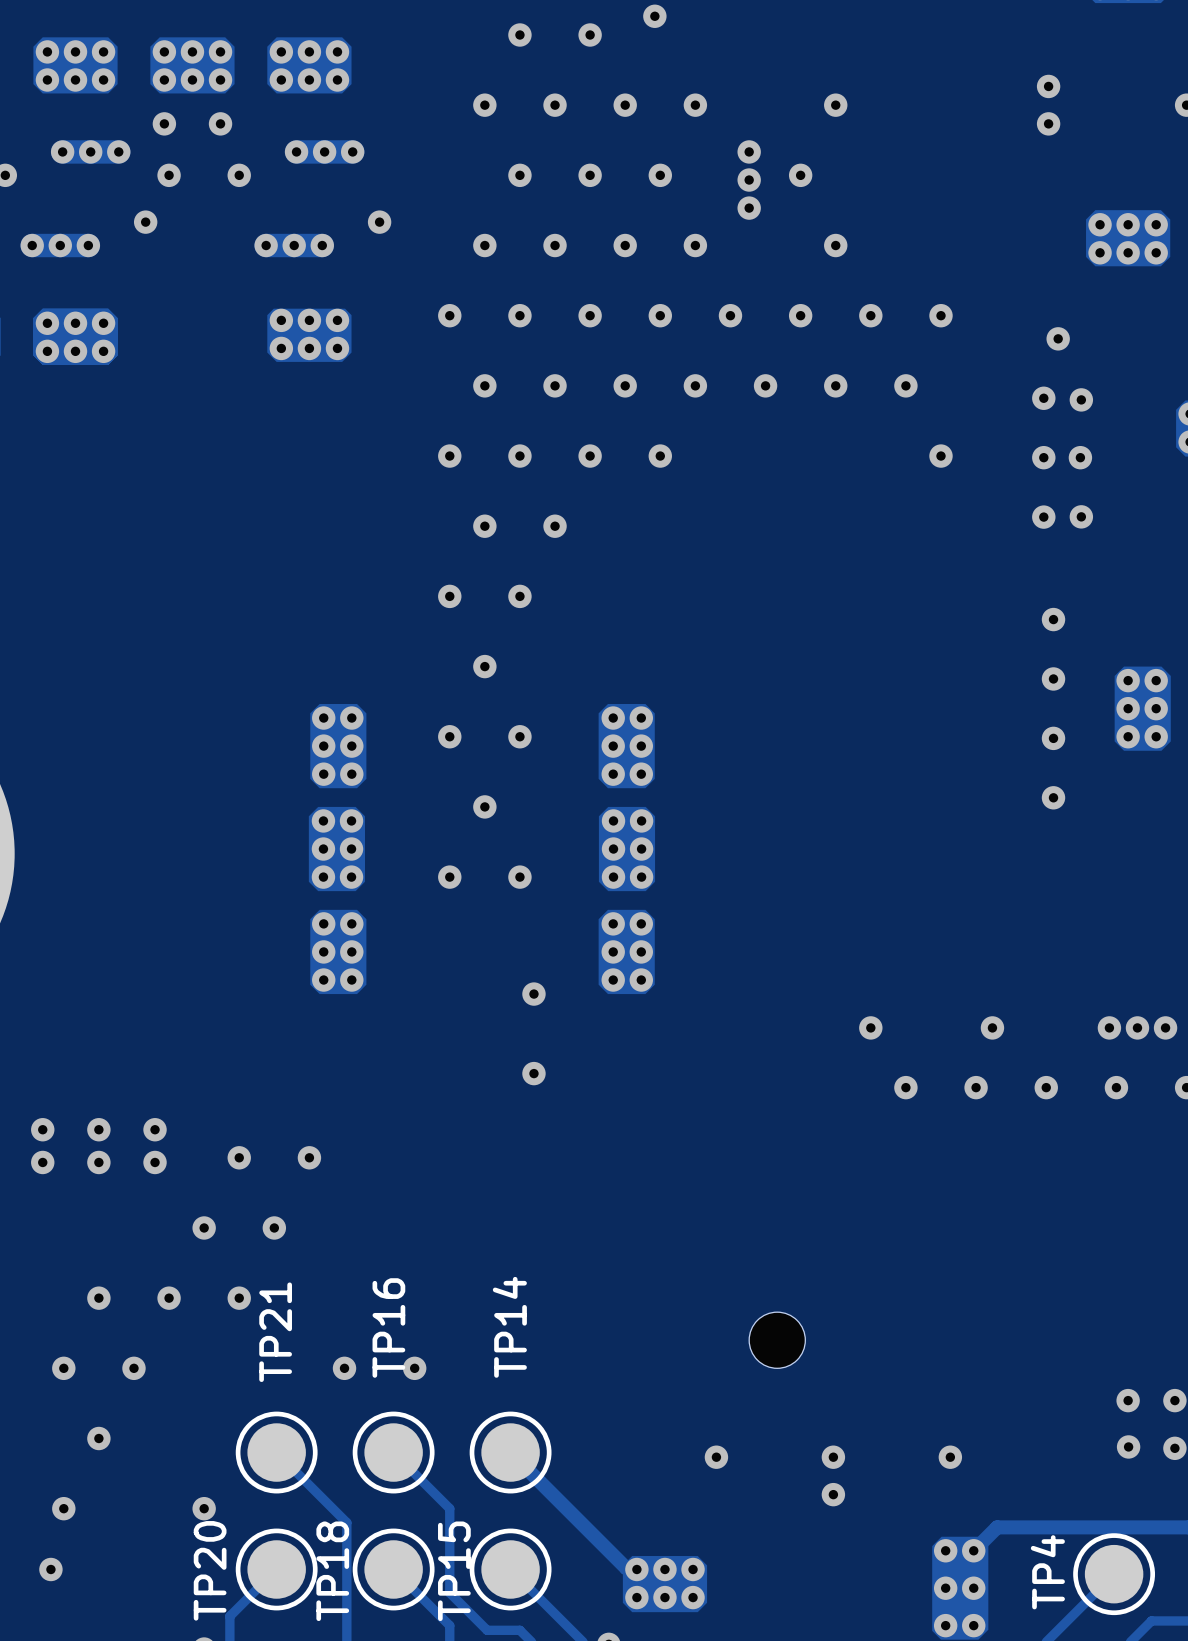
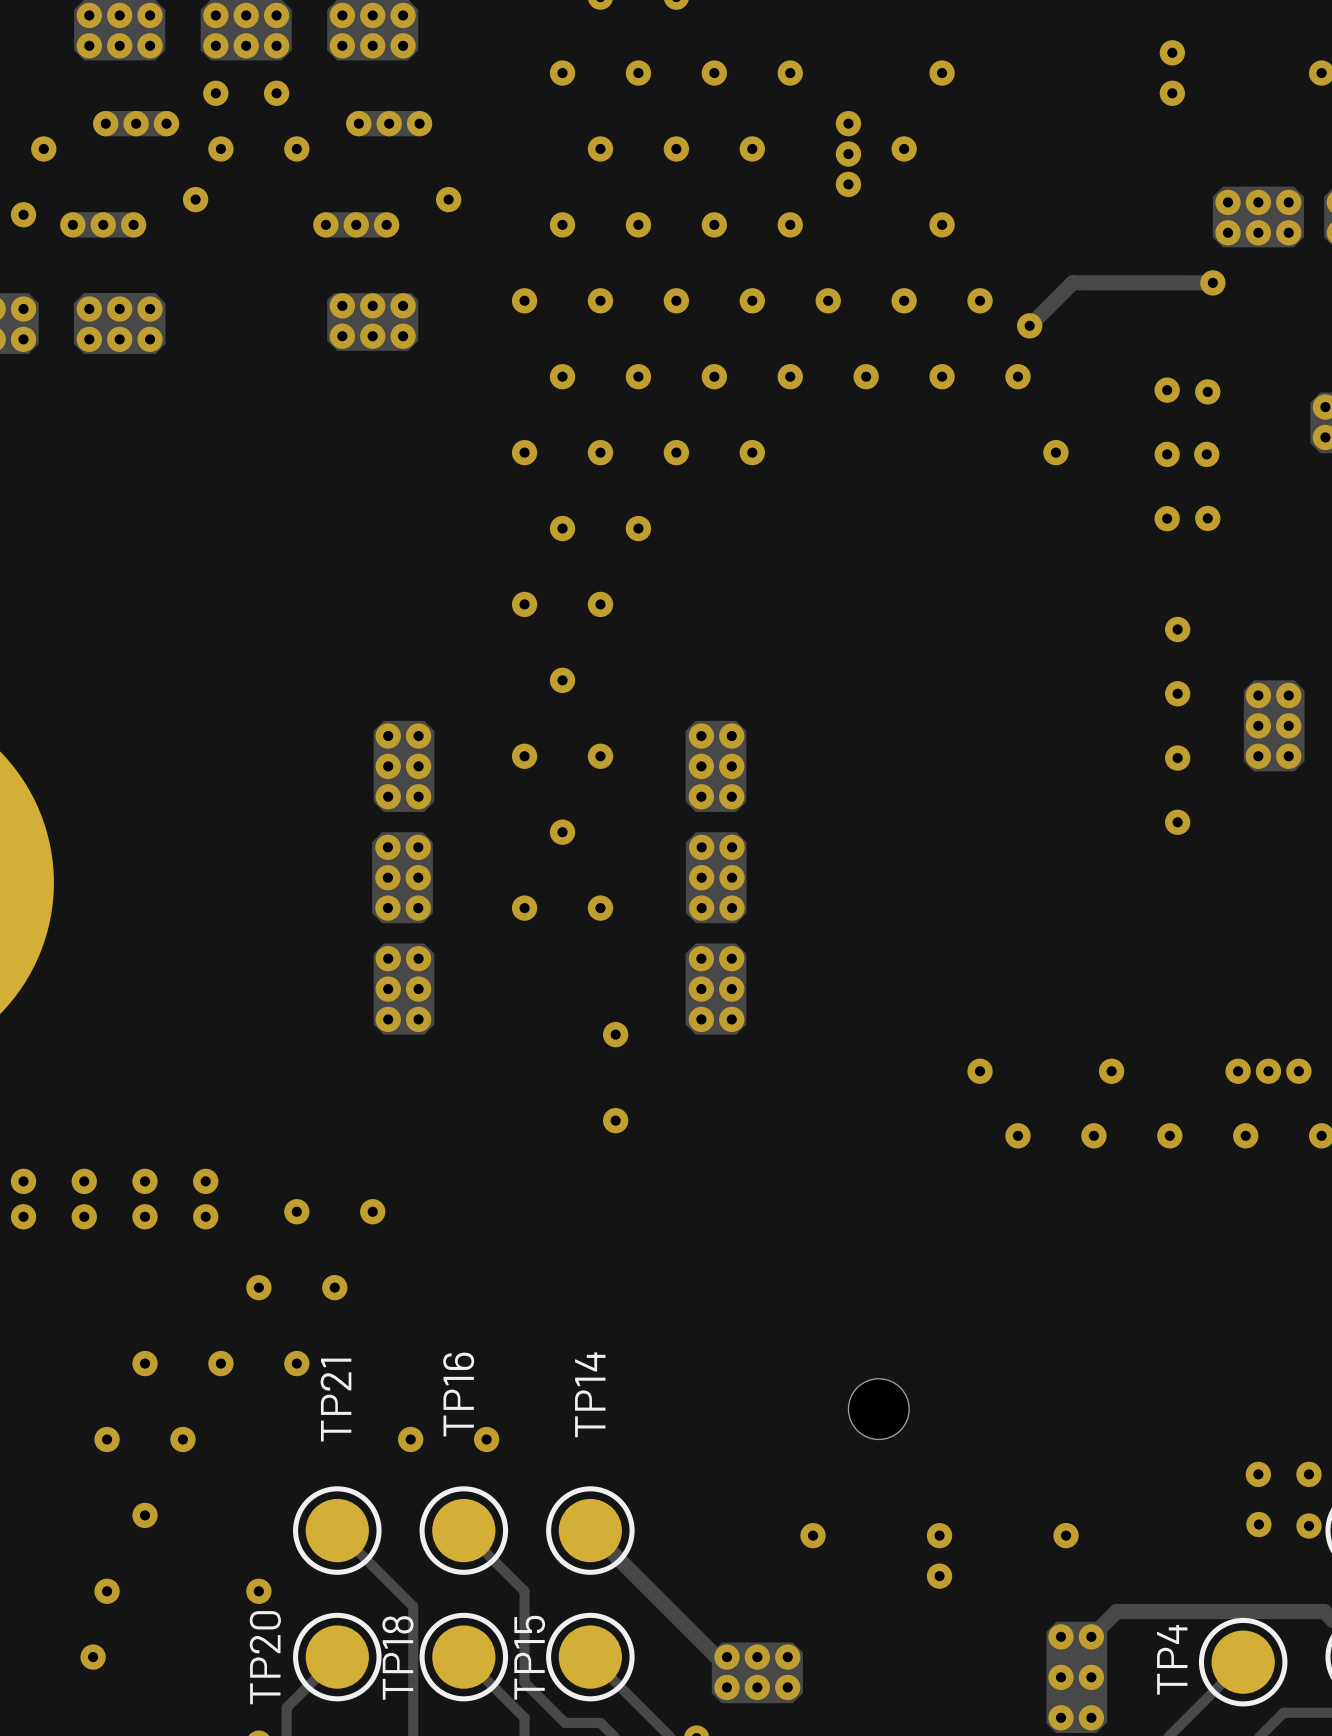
track: none -> (1212, 282) (1072, 282) (1029, 325)
via position: (941, 315) -> (1029, 325)
via position: (1058, 338) -> (1212, 282)

